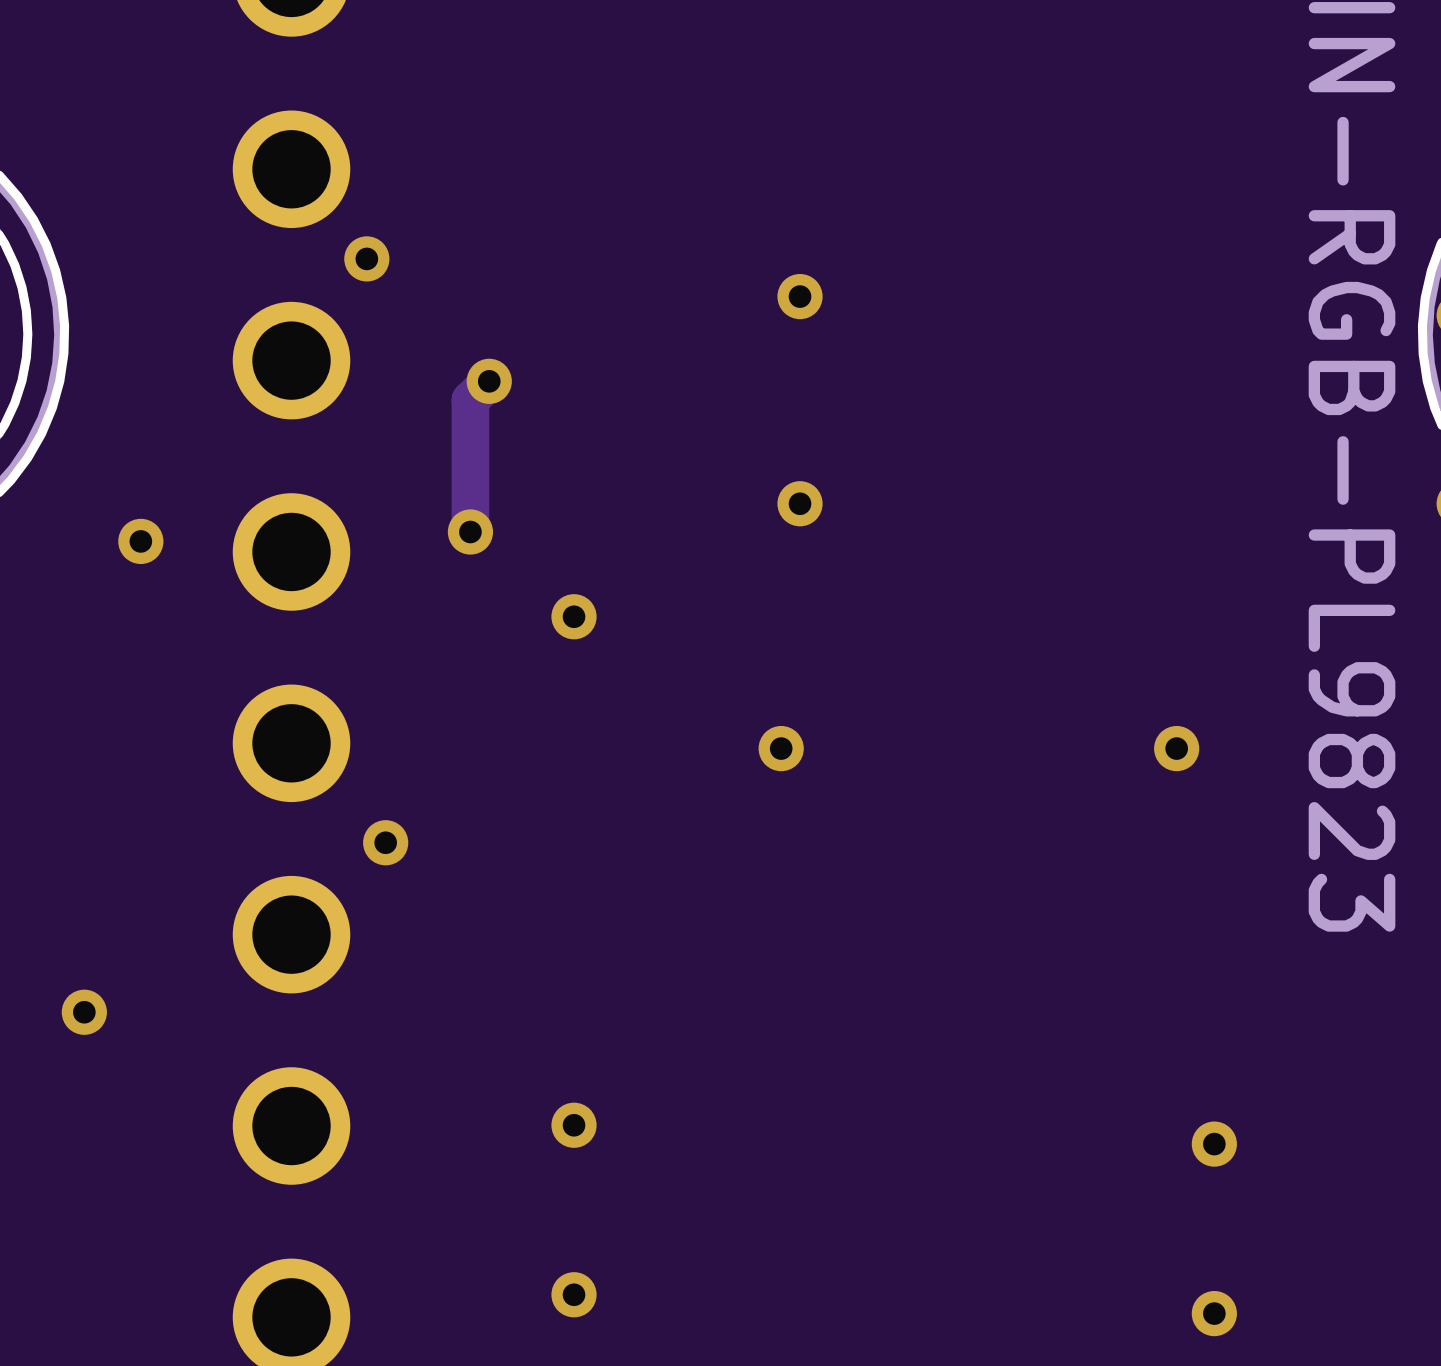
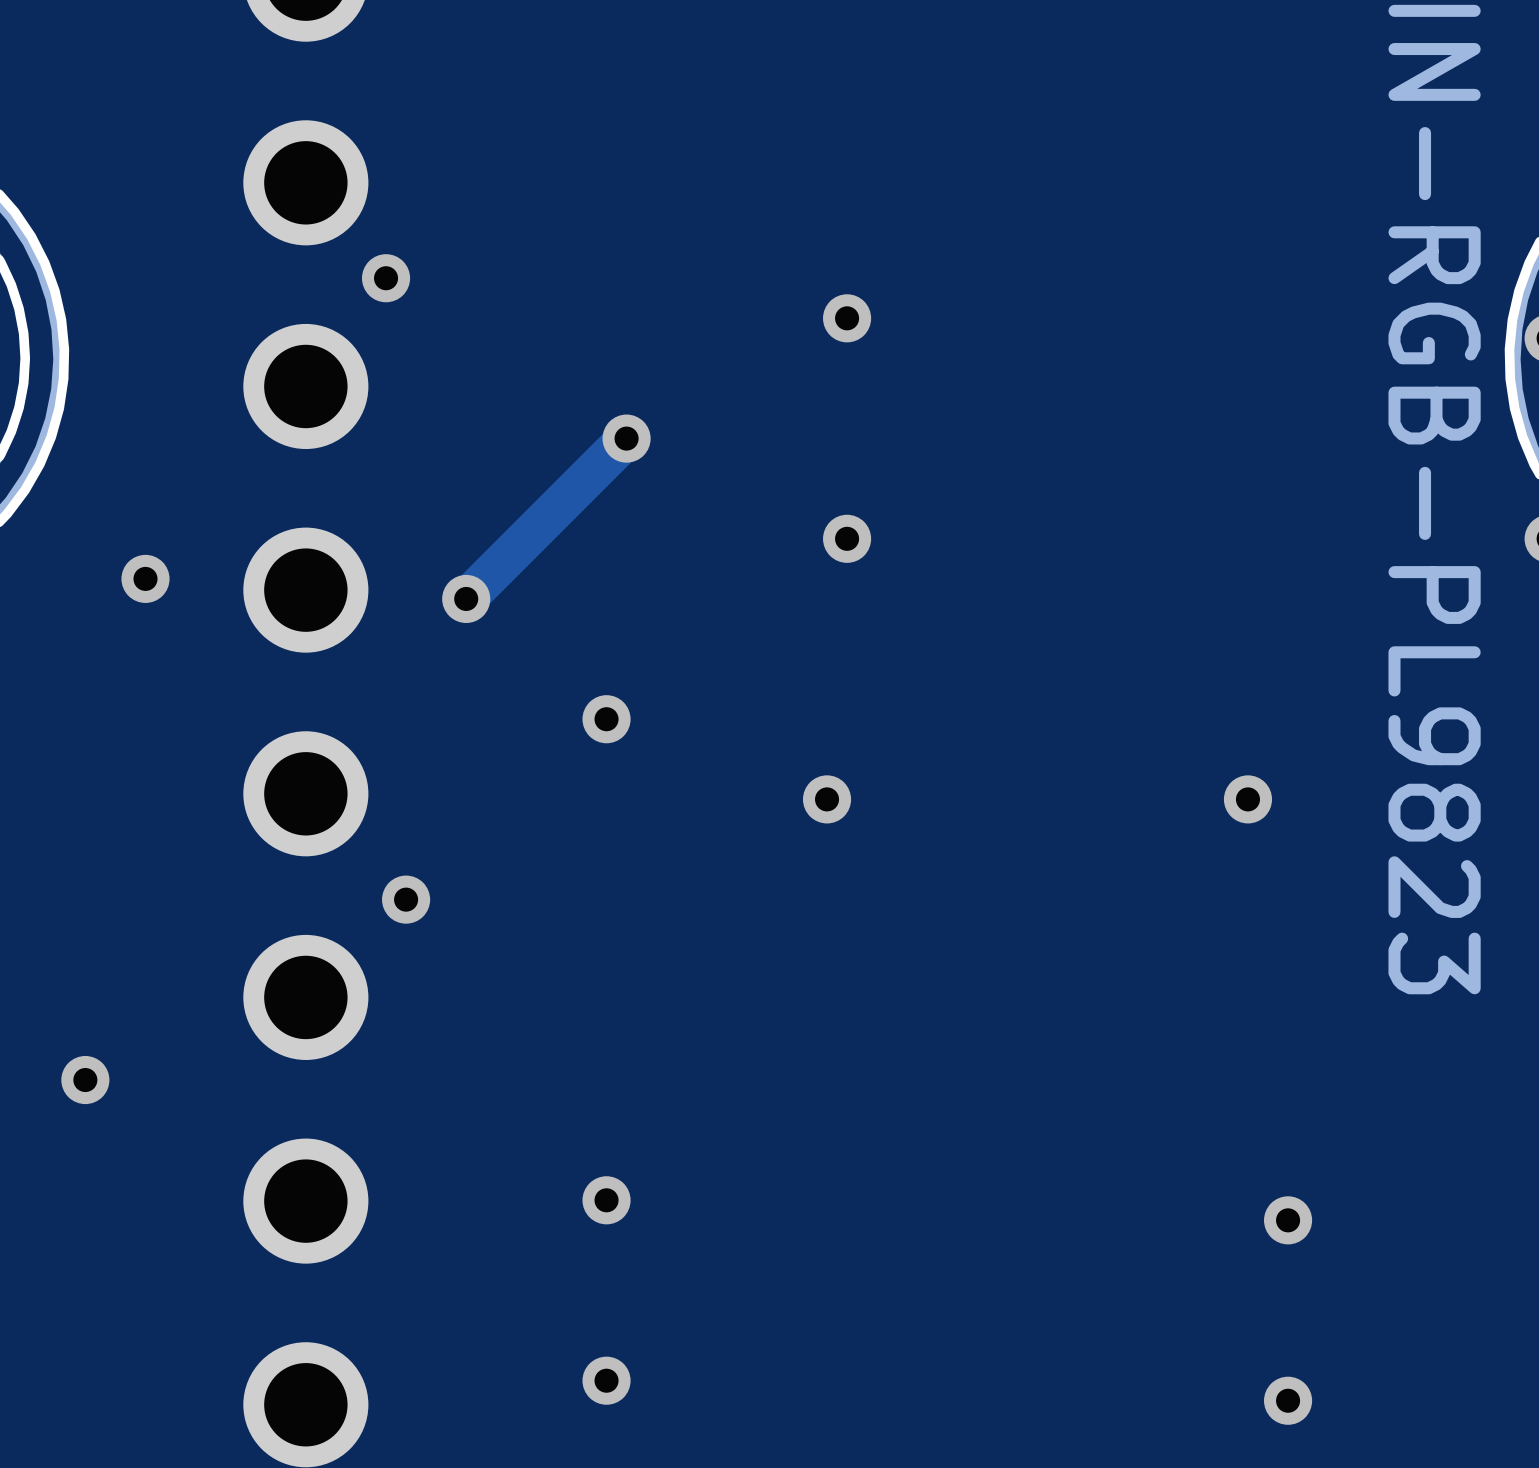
track: (489, 381) (470, 400) (470, 532) -> none
via: (489, 381) -> none
track: none -> (626, 438) (466, 598)
via: none -> (626, 438)
via position: (470, 532) -> (466, 598)
via position: (574, 616) -> (606, 719)

